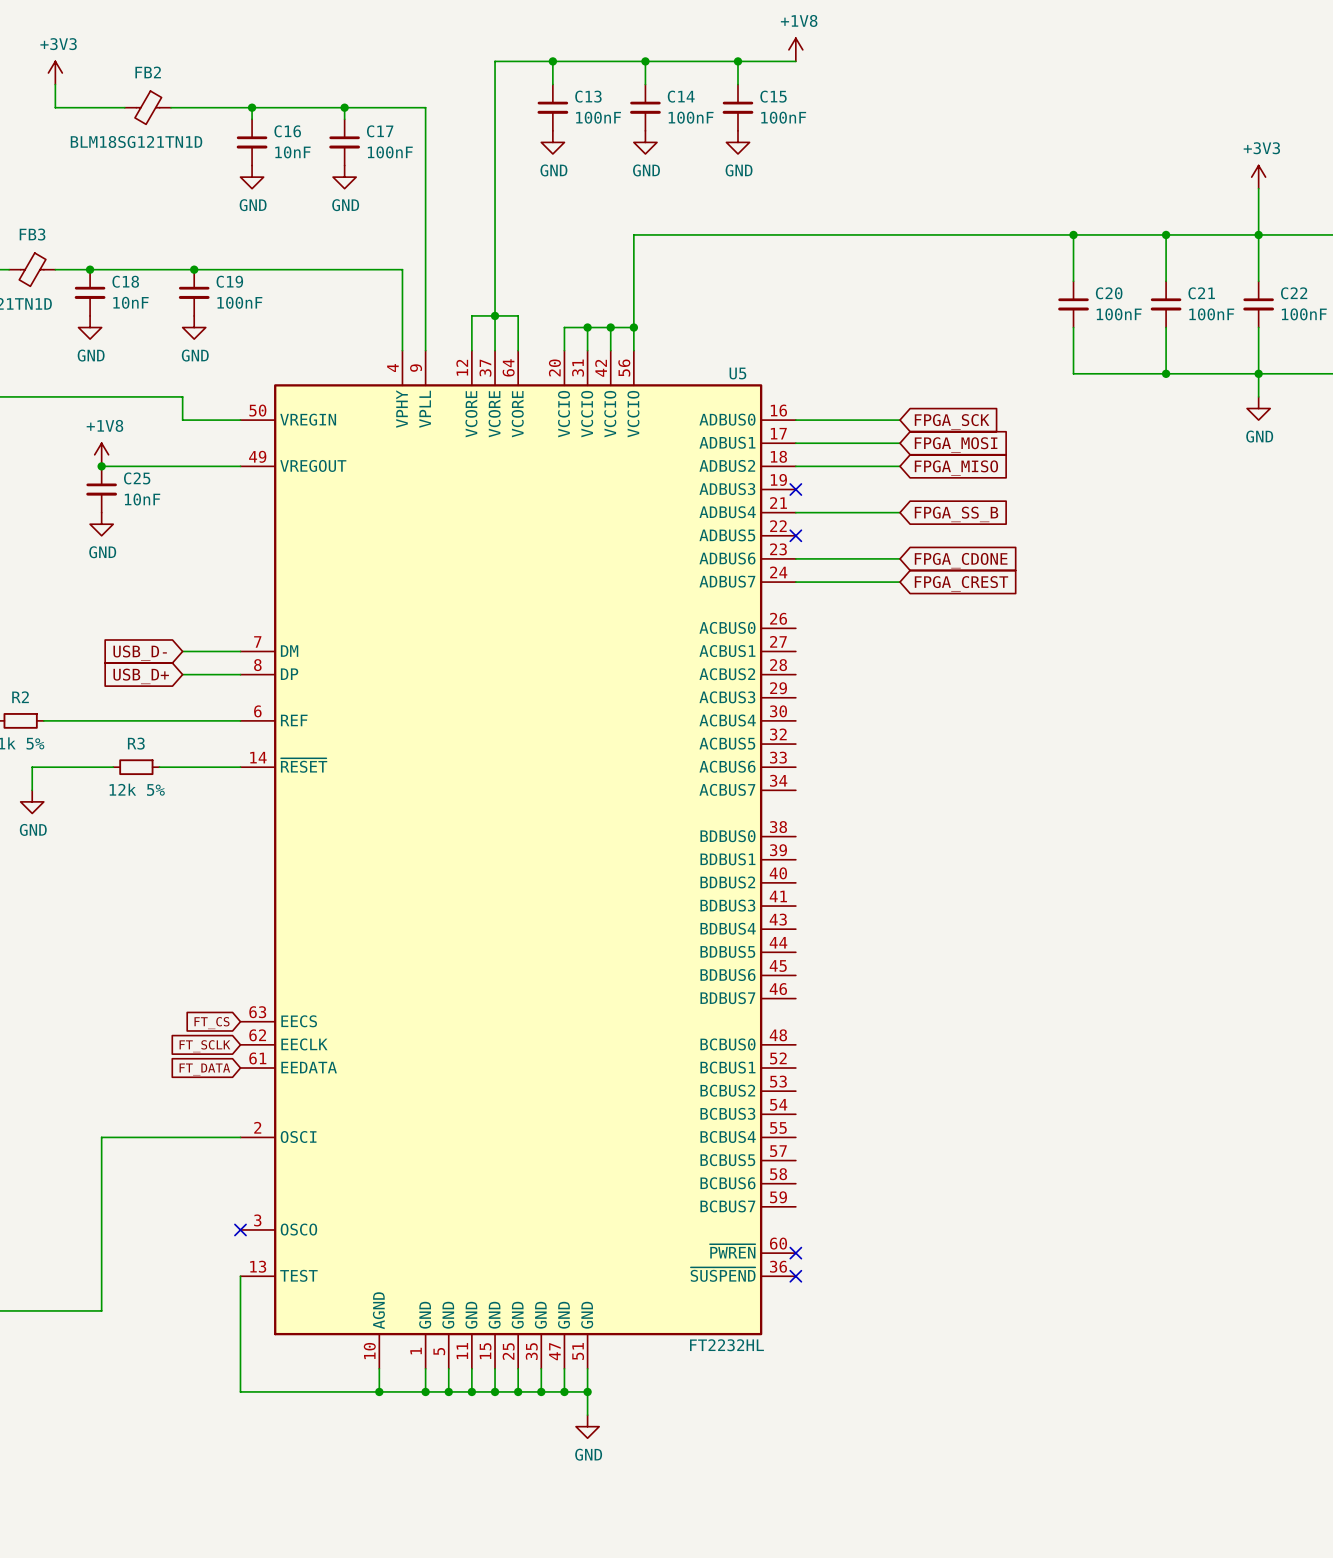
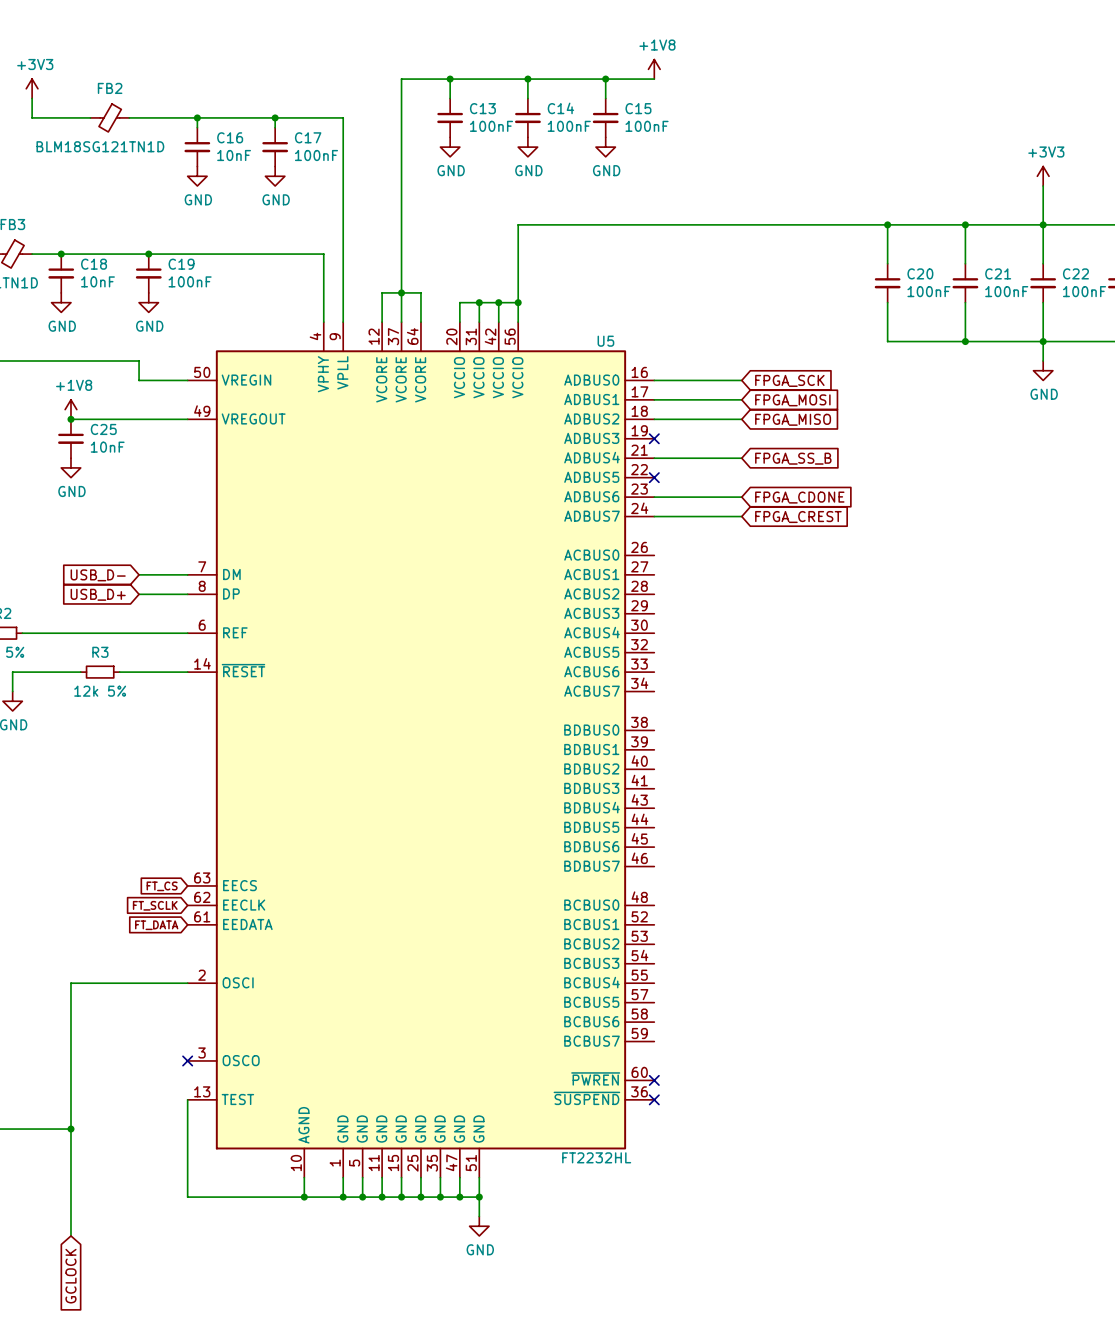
wire: none -> (70, 1129) (70, 1235)
junction: none -> (70, 1129)
global label: none -> GCLOCK (70, 1276)

